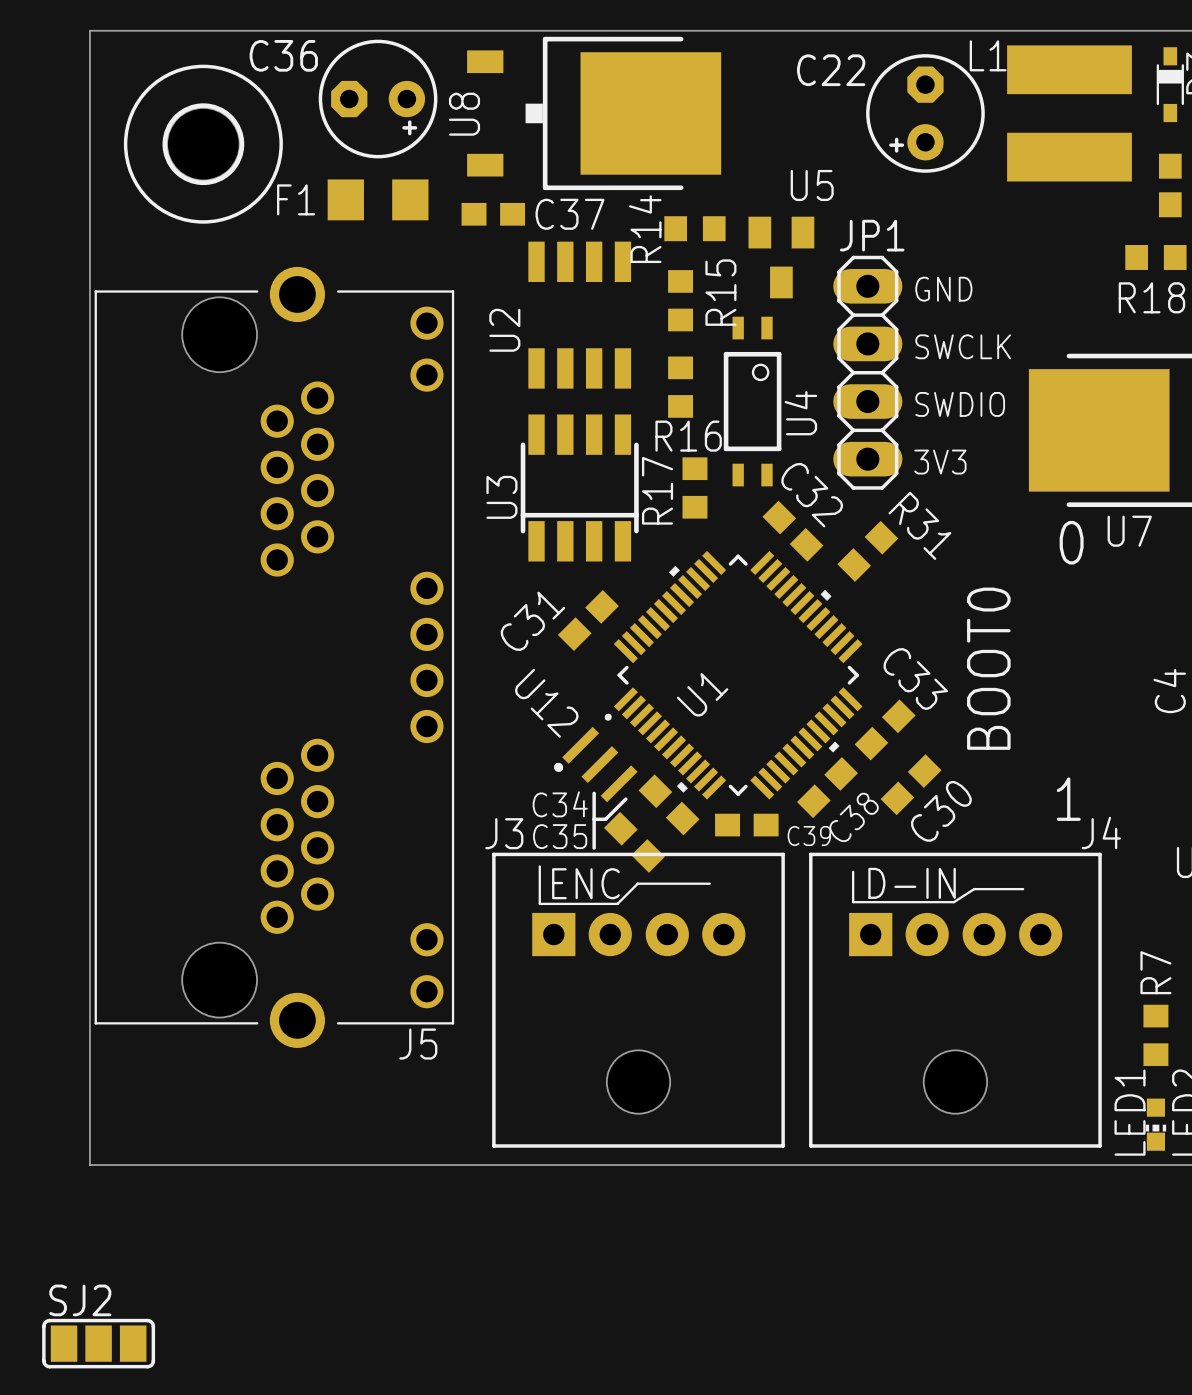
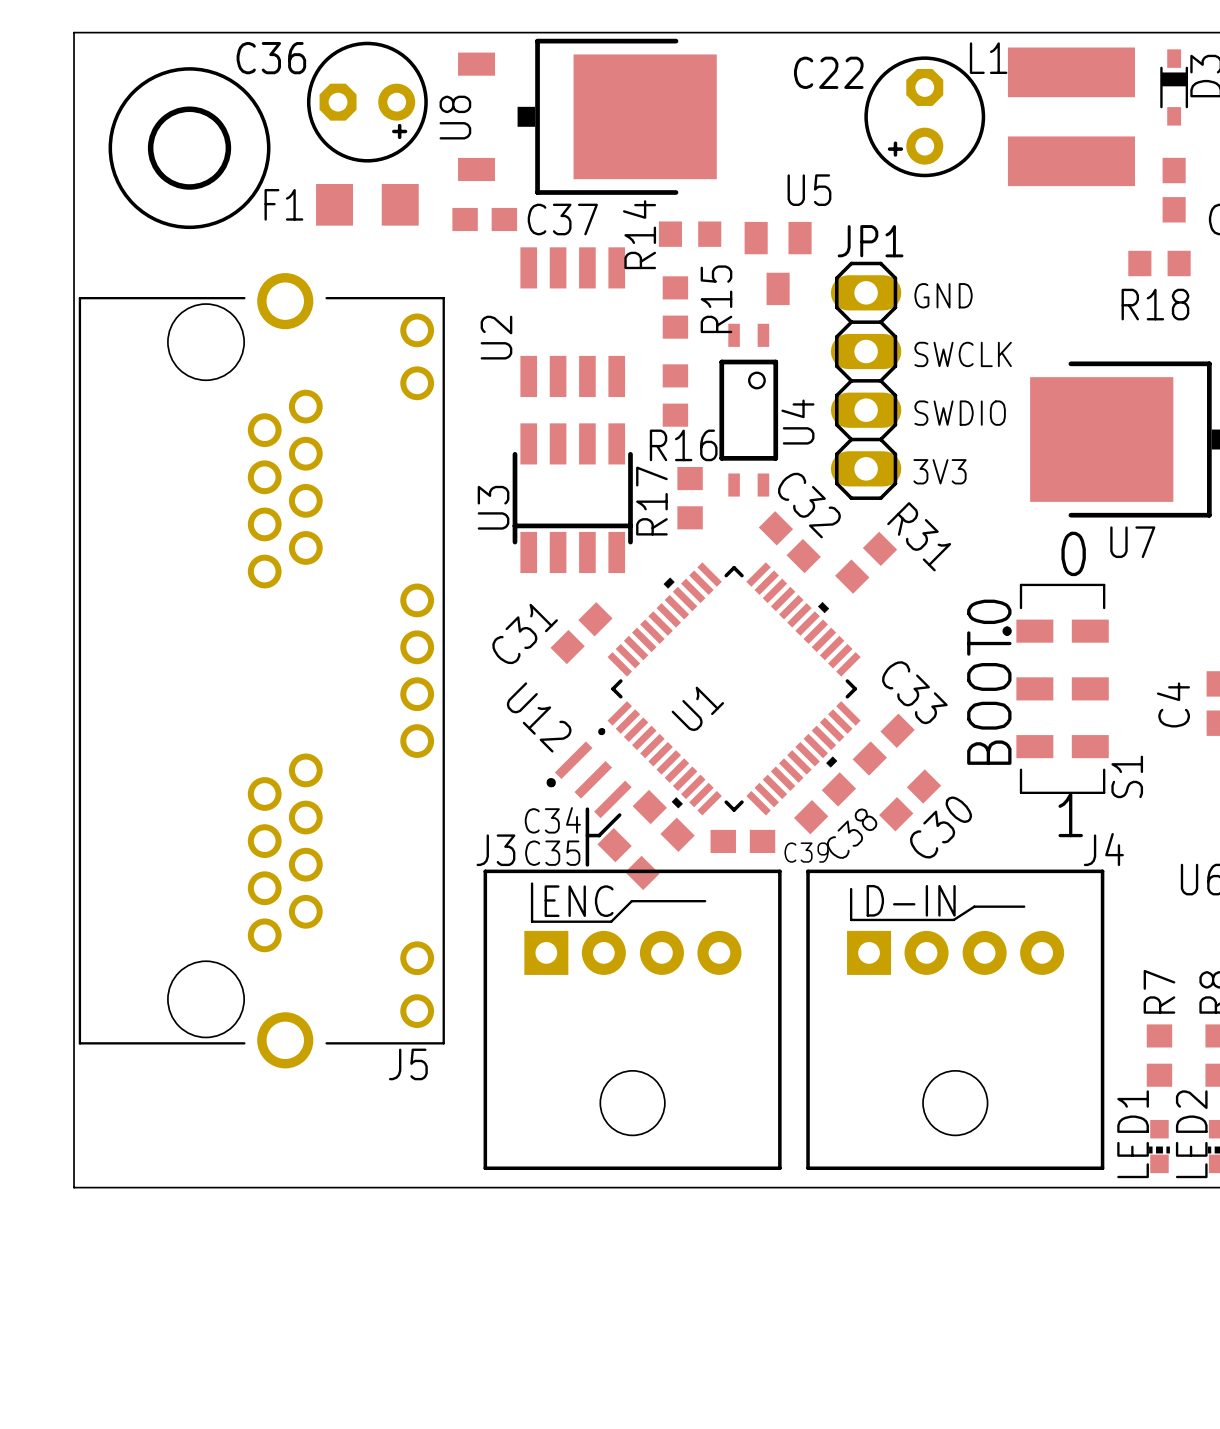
S1: none -> (1055, 688)
SJ2: (98, 1343) -> none

